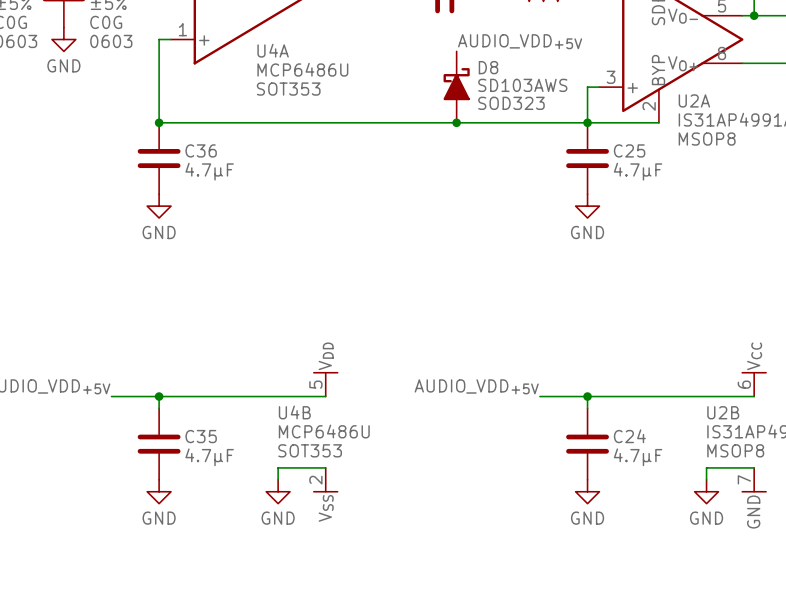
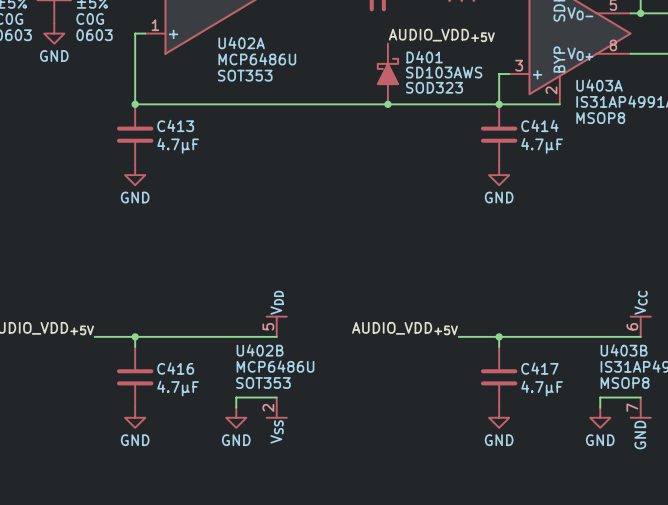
U4A name: U4A (273, 50) -> U402A (241, 43)
D8 name: D8 (488, 67) -> D401 (424, 57)
U2A name: U2A (694, 100) -> U403A (599, 85)
C36 name: C36 (201, 150) -> C413 (175, 125)
C25 name: C25 (629, 150) -> C414 (539, 125)
U4B name: U4B (294, 412) -> U402B (260, 350)
U2B name: U2B (723, 412) -> U403B (624, 350)
C35 name: C35 (201, 436) -> C416 (175, 368)
C24 name: C24 (629, 436) -> C417 (539, 368)

